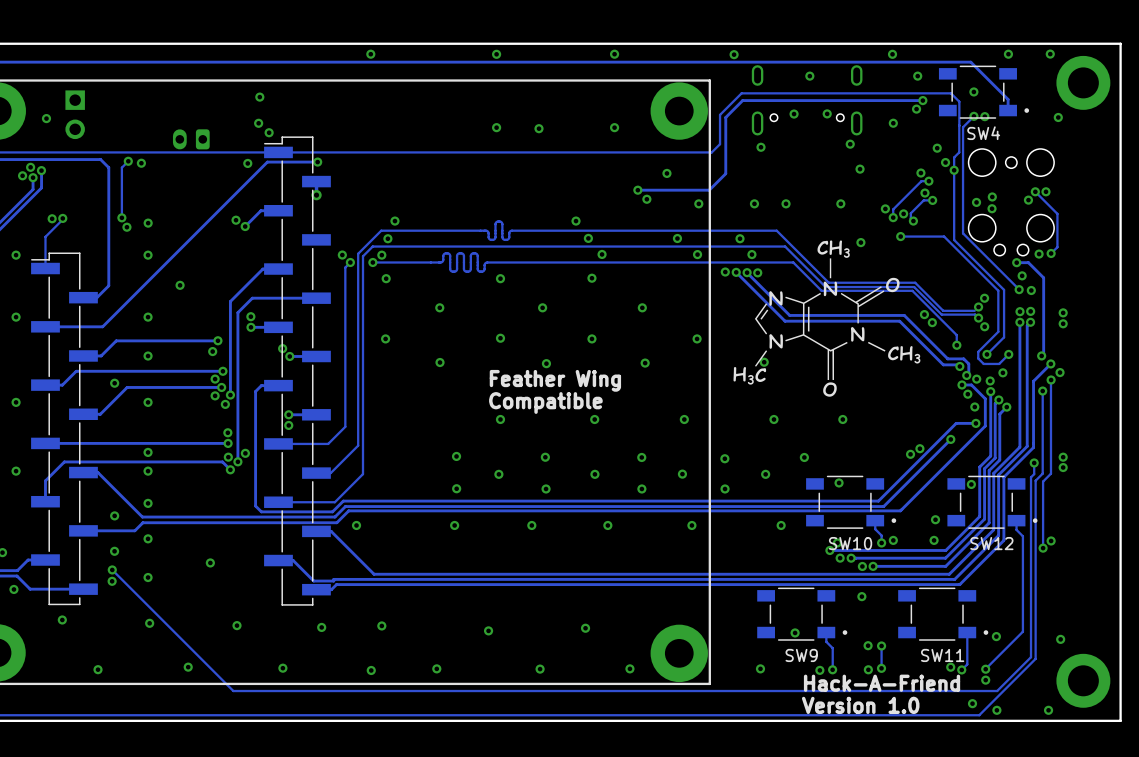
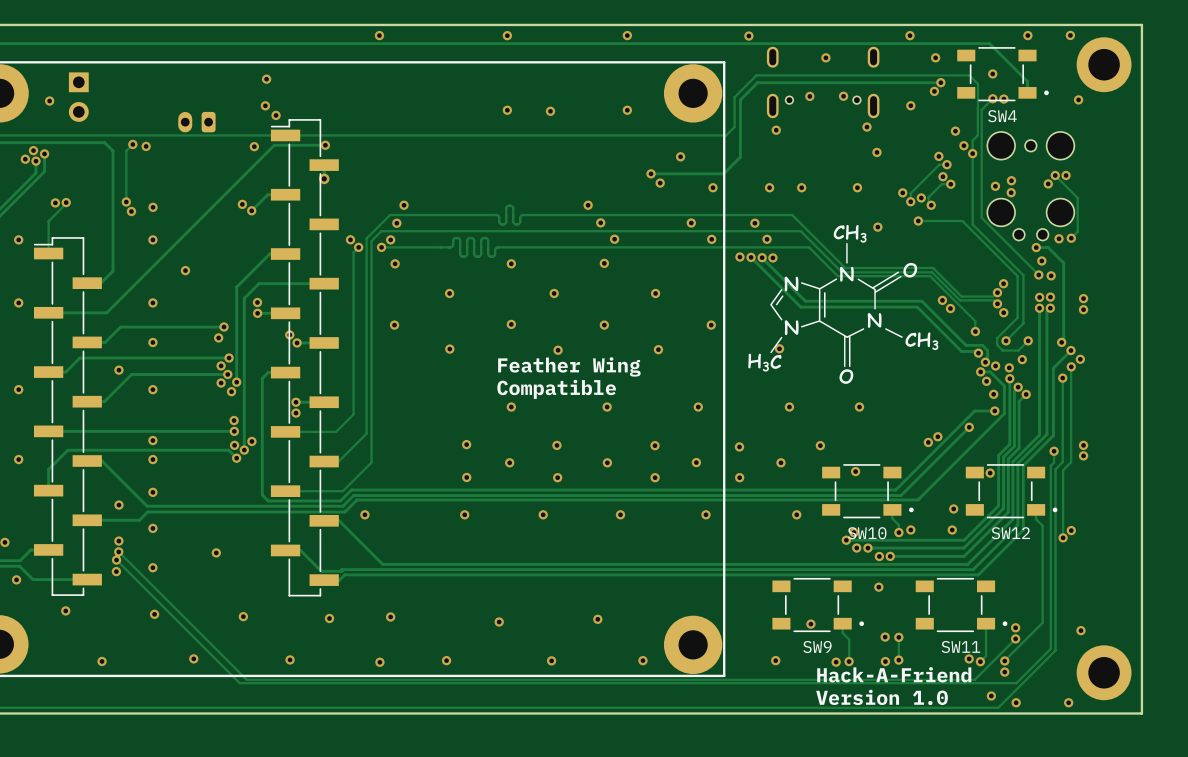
track: none -> (118, 551) (246, 679) (974, 679) (1015, 638)
via: none -> (118, 551)
via: none -> (1015, 638)

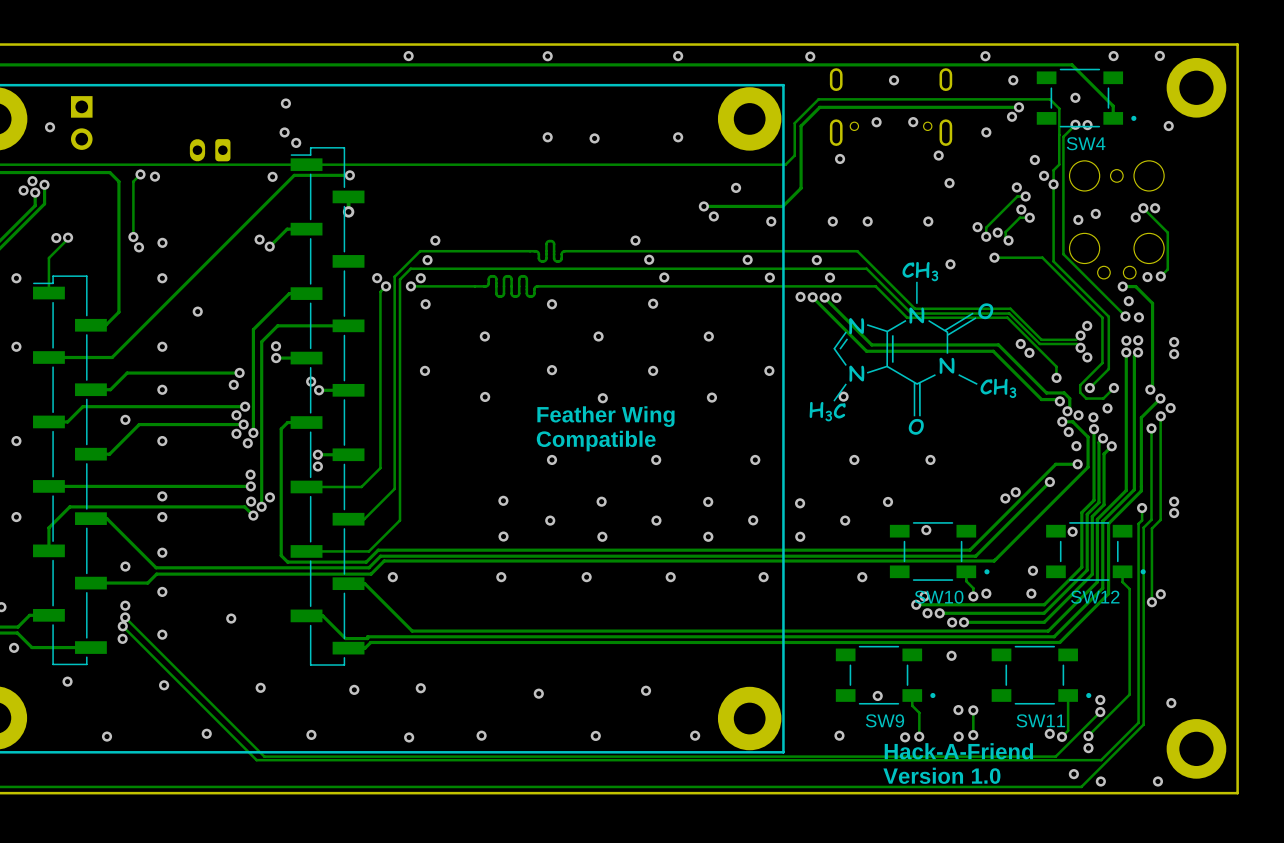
via: (1011, 192) -> none

